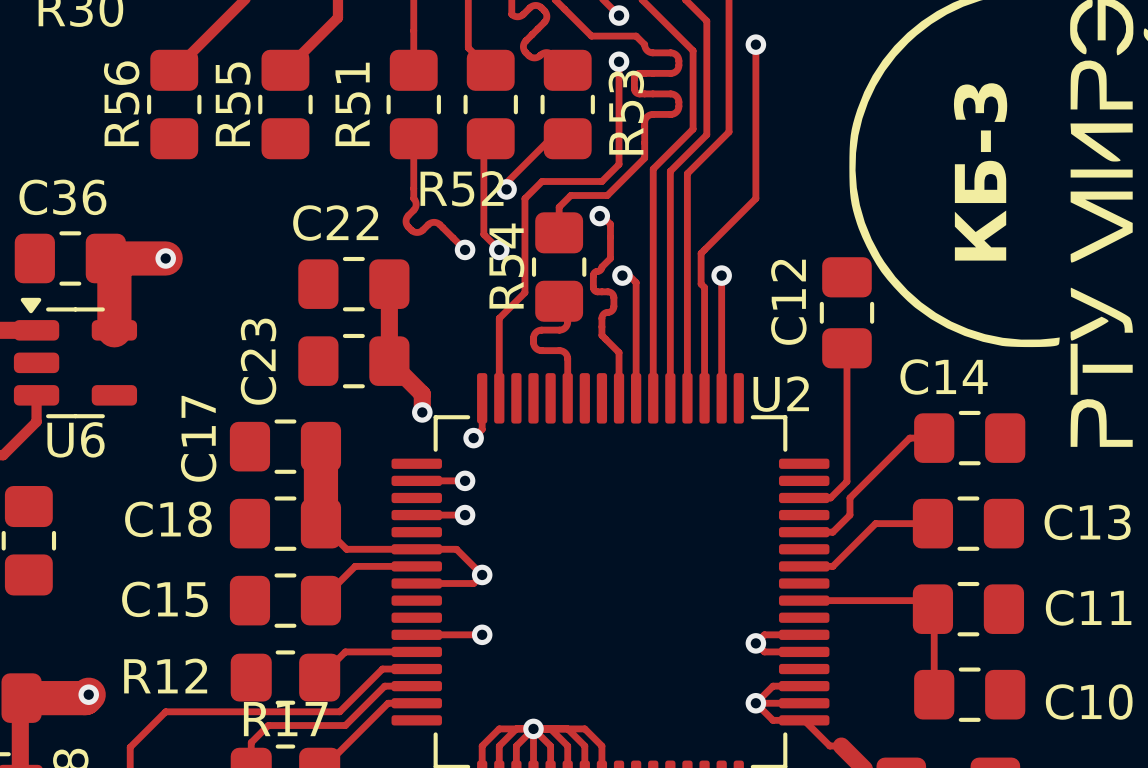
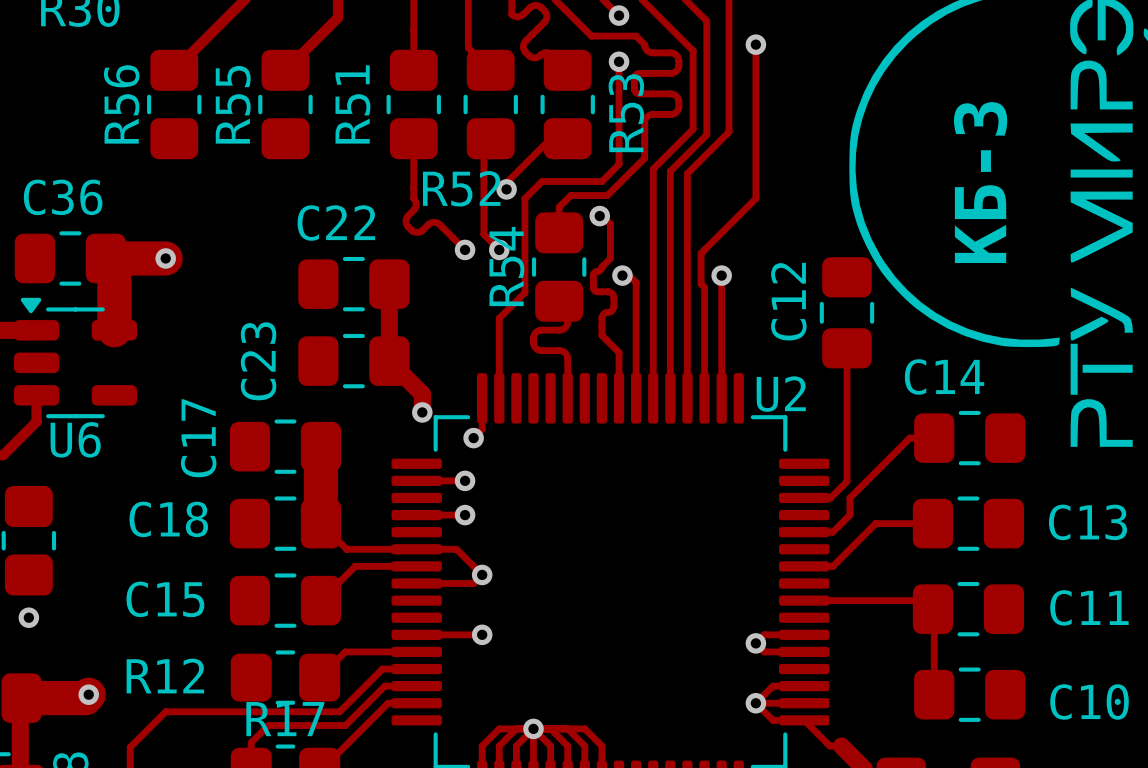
via: none -> (28, 617)

